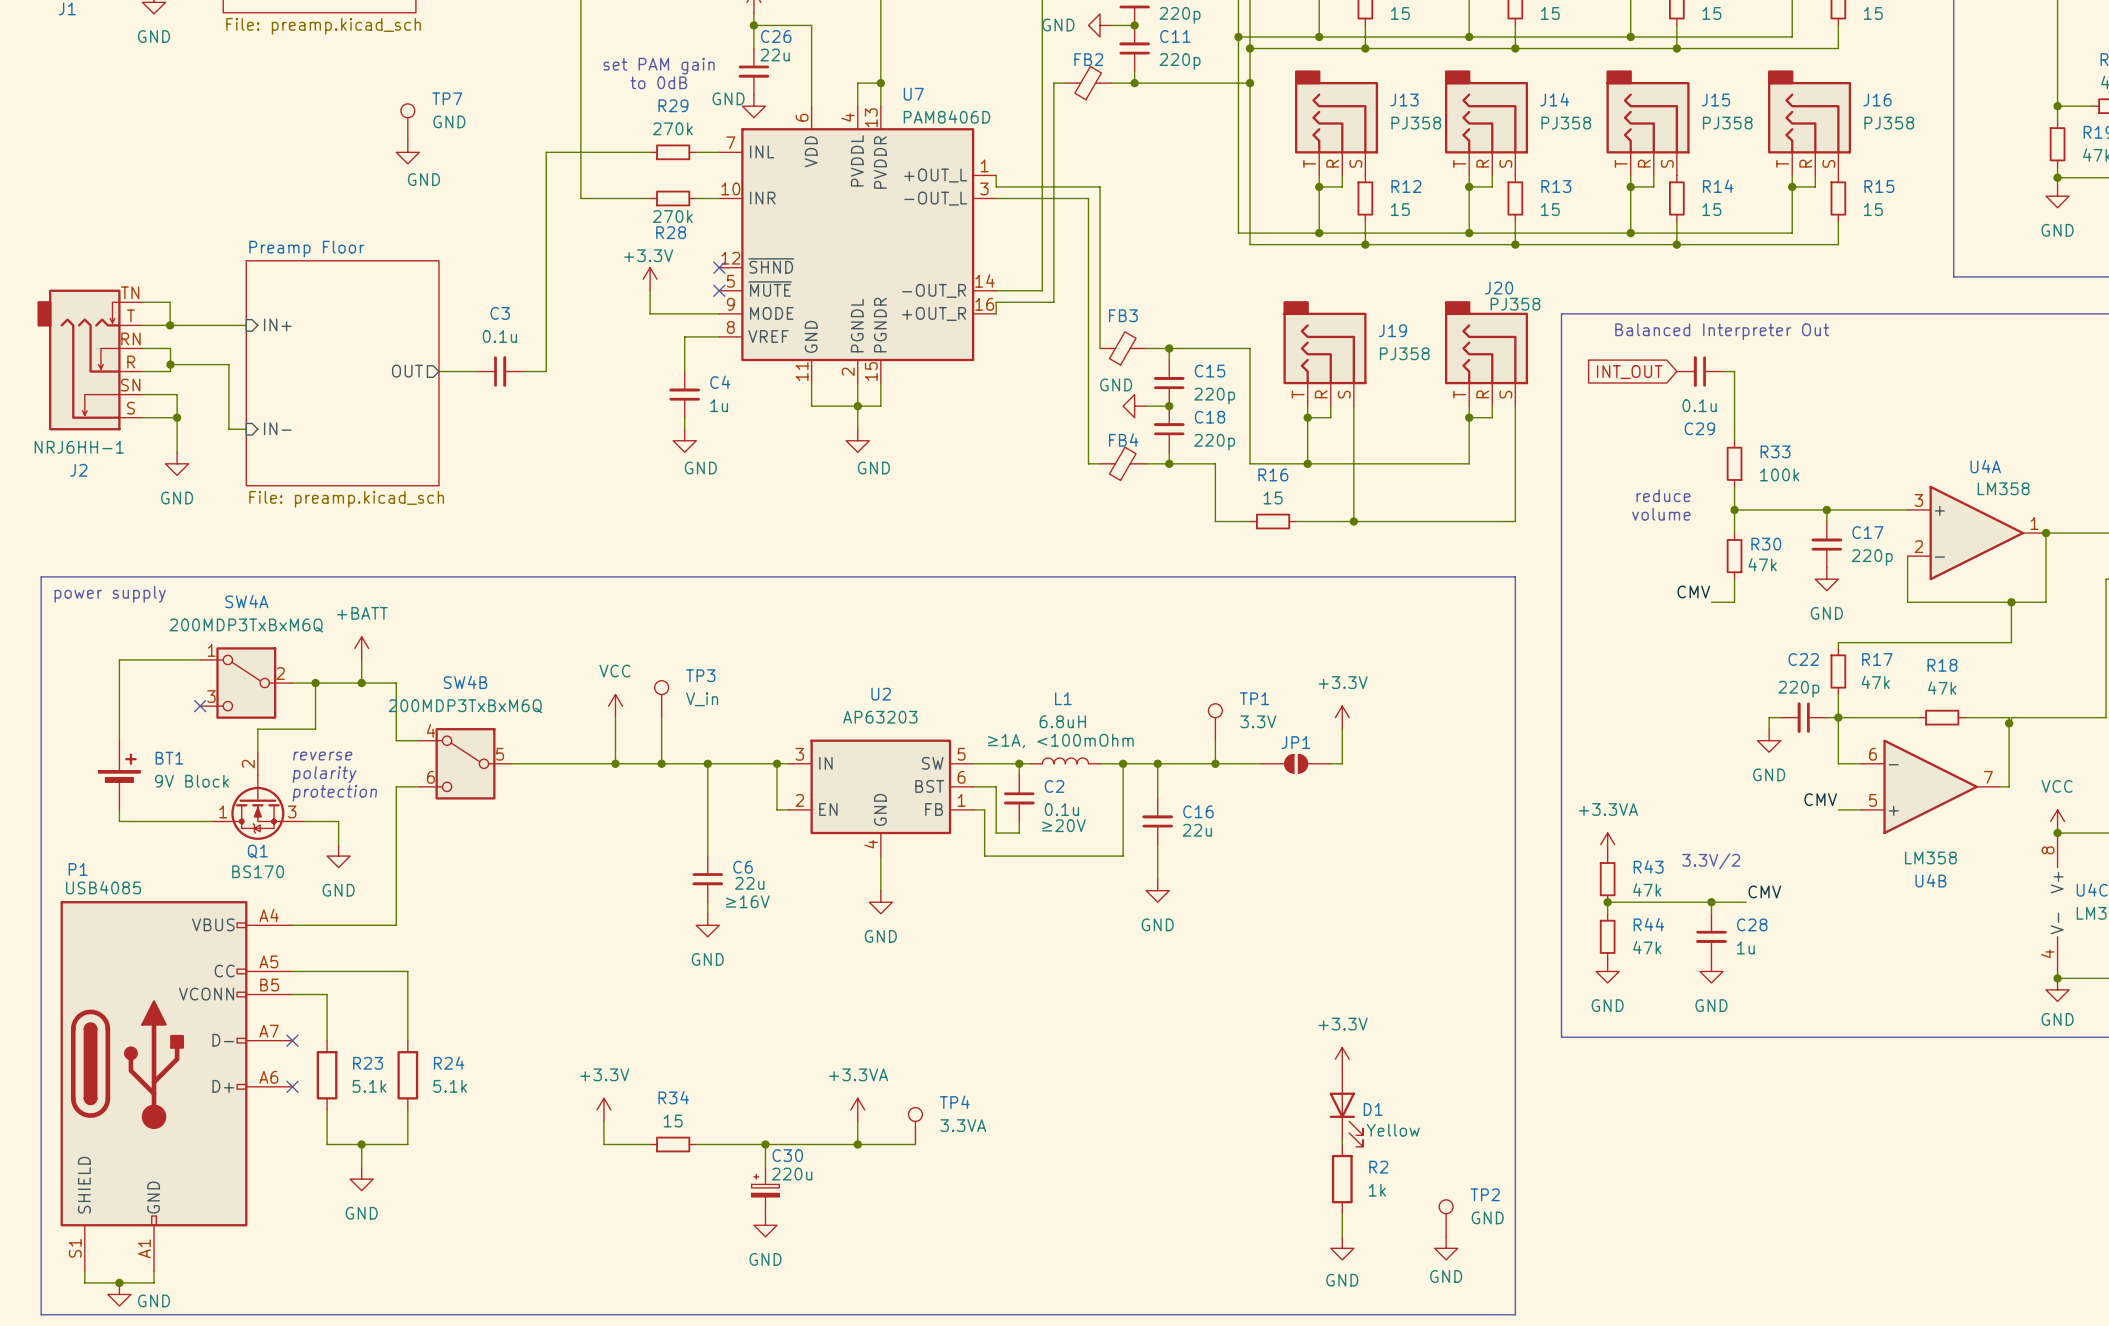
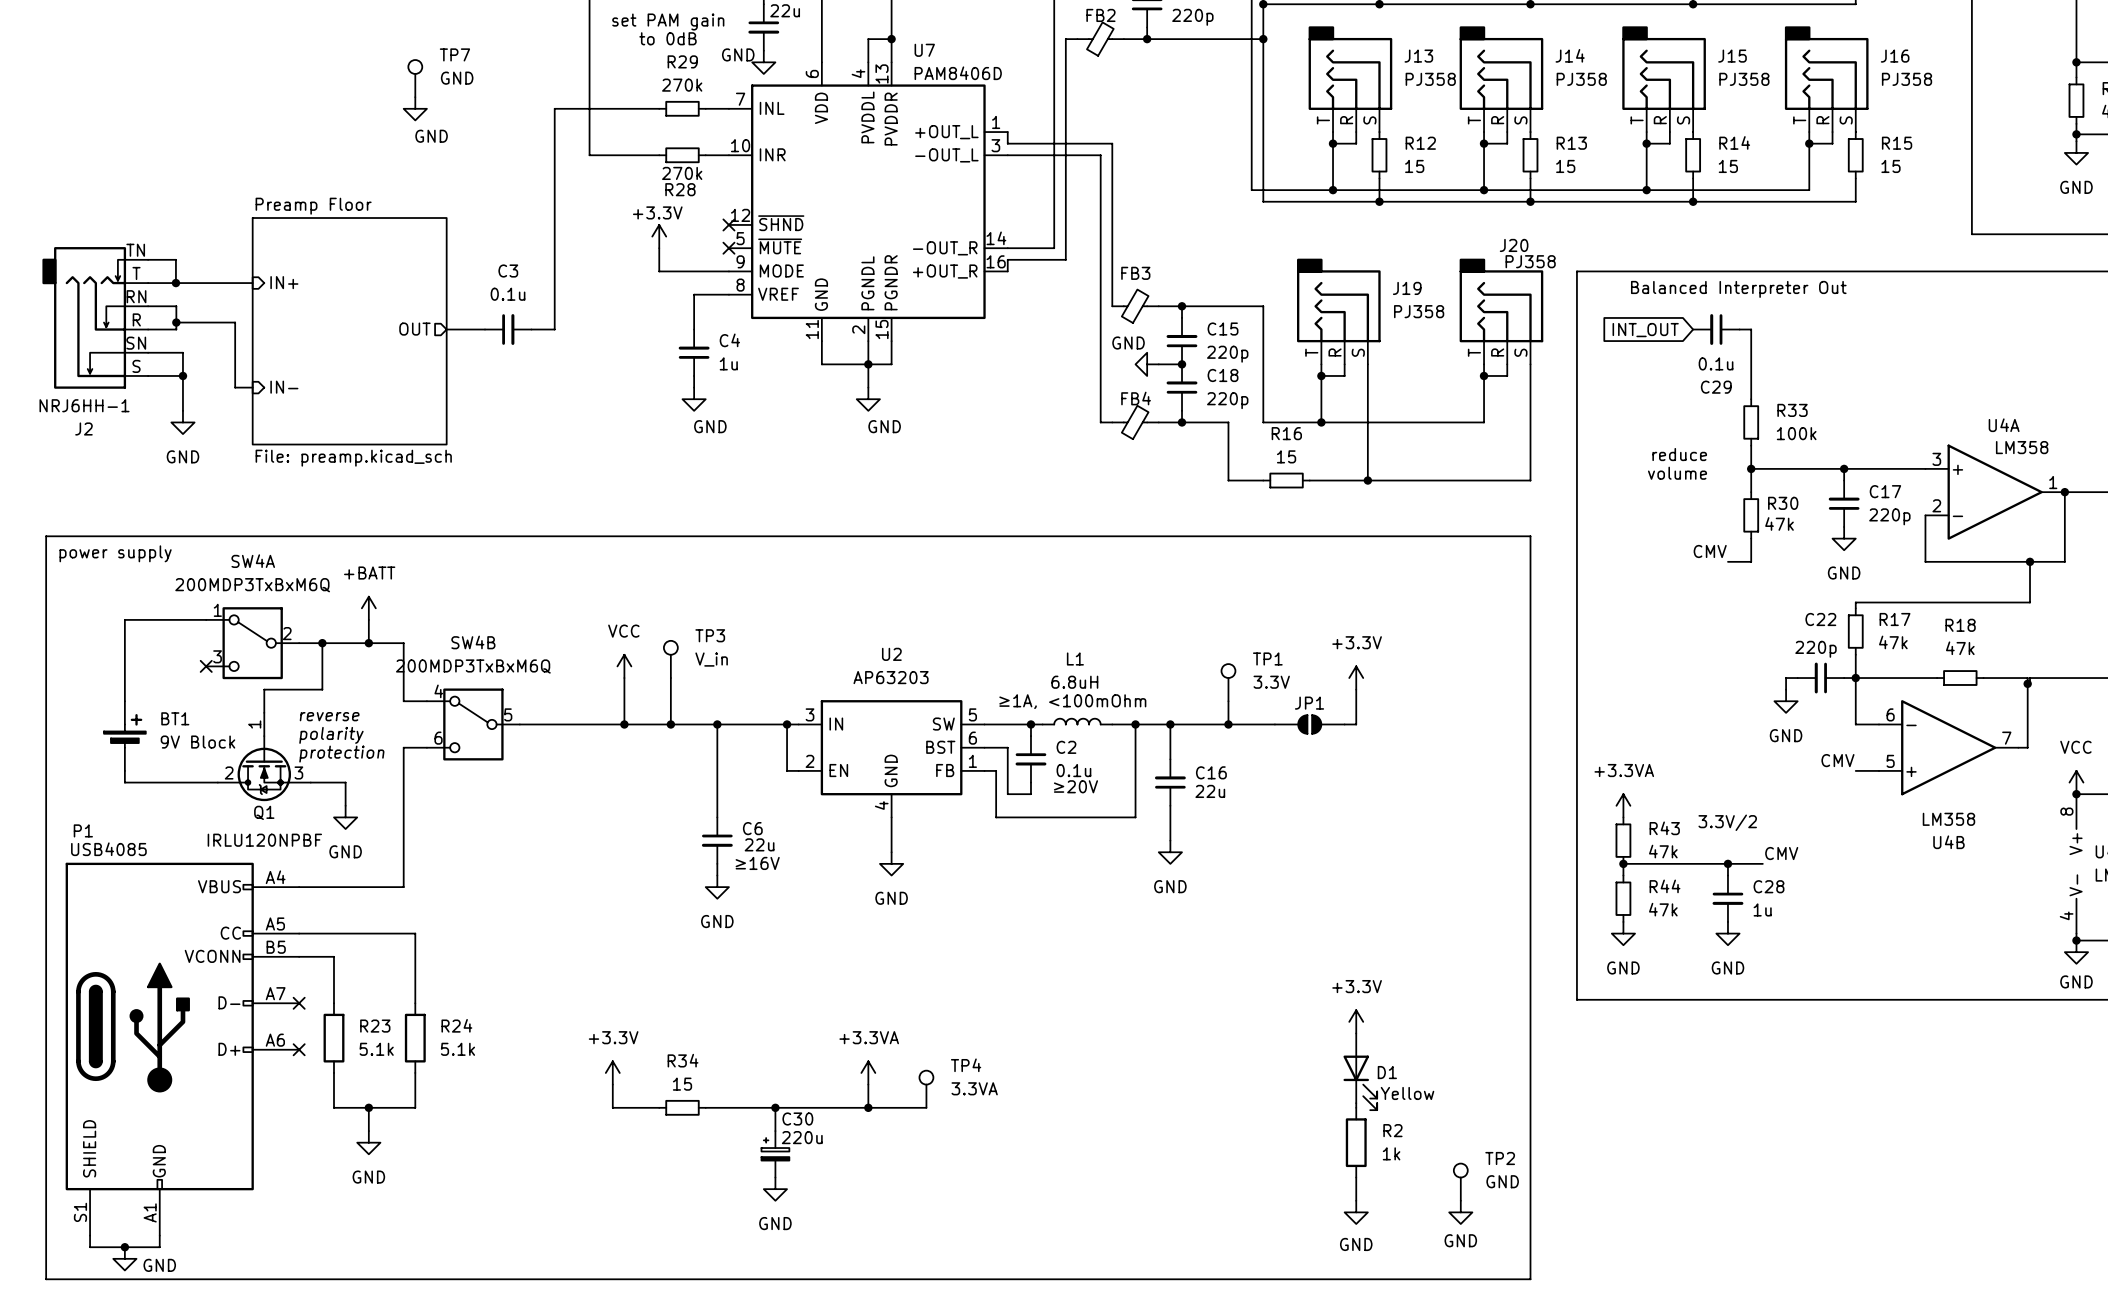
Q1 pin number: 2 (248, 764) -> 1 (254, 724)
Q1 pin number: 1 (223, 811) -> 2 (229, 772)
Q1 value: BS170 (258, 871) -> IRLU120NPBF (264, 840)

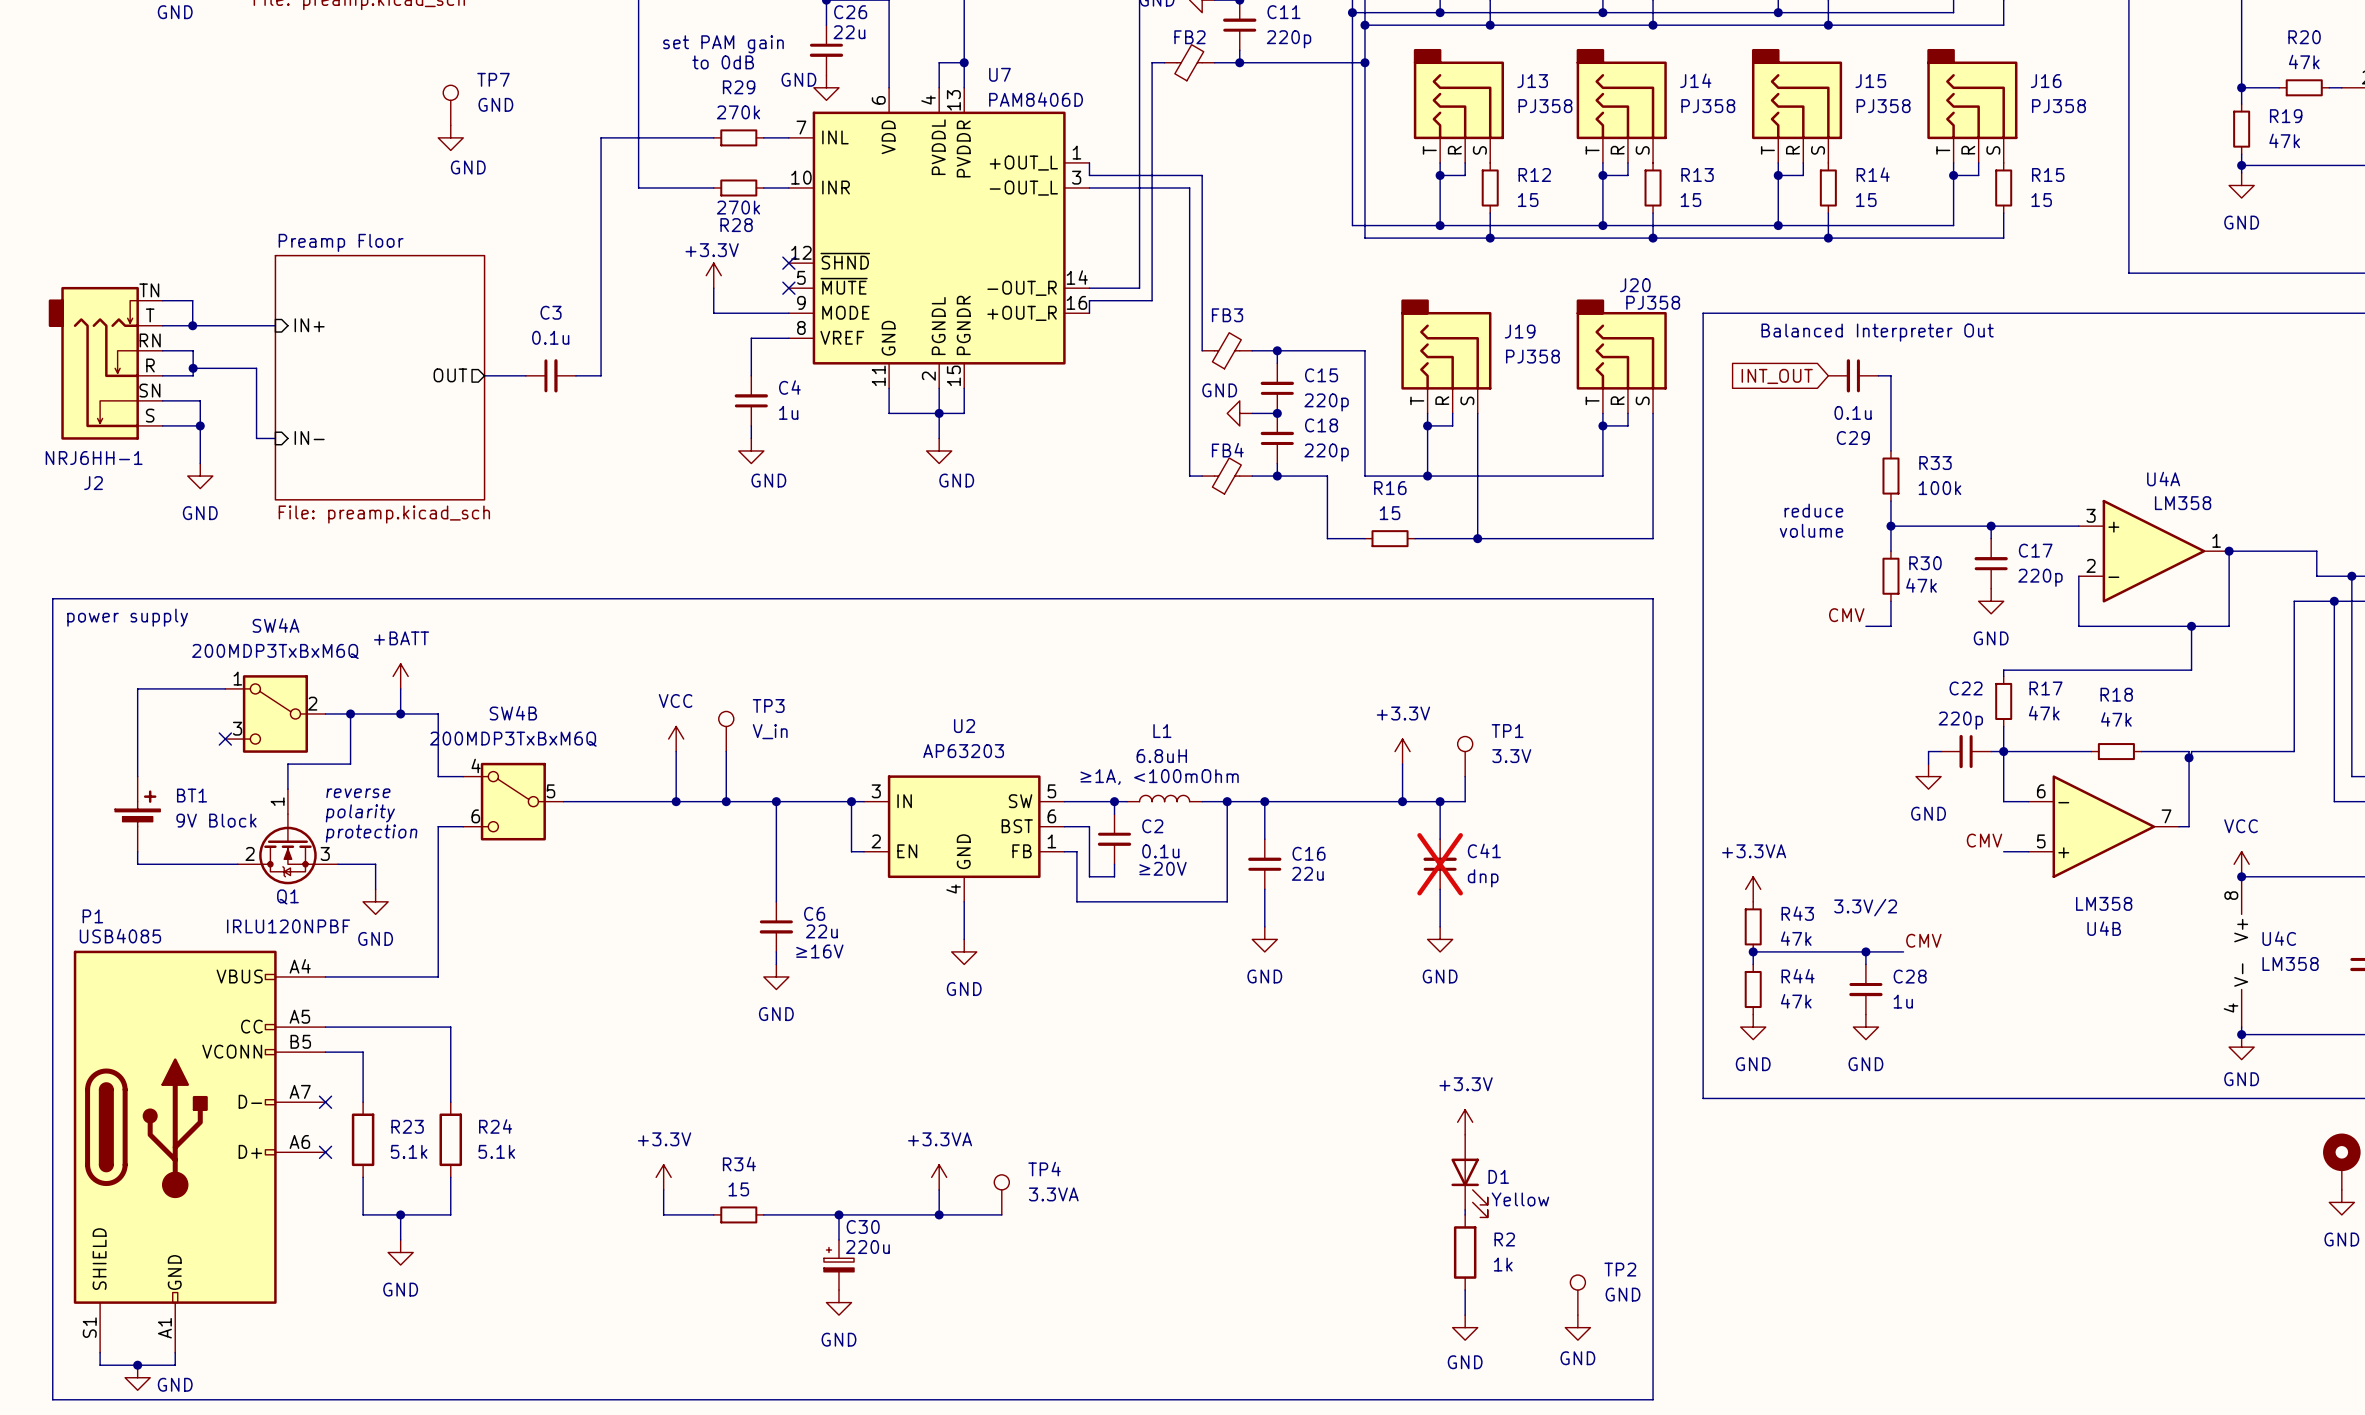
power symbol position: +3.3V (1356, 678) -> +3.3V (1402, 751)
TP1 position: (1228, 682) -> (1465, 756)
wire: none -> (1402, 764) (1402, 801)
wire: (1228, 701) (1228, 724) -> none
junction: (1228, 724) -> none
junction: none -> (1402, 801)
JP1: (1309, 724) -> none
wire: none -> (1440, 801) (1440, 839)
junction: none -> (1440, 801)
C41: none -> dnp (1440, 864)
wire: none -> (1440, 889) (1440, 926)
power symbol: none -> GND (1440, 939)

